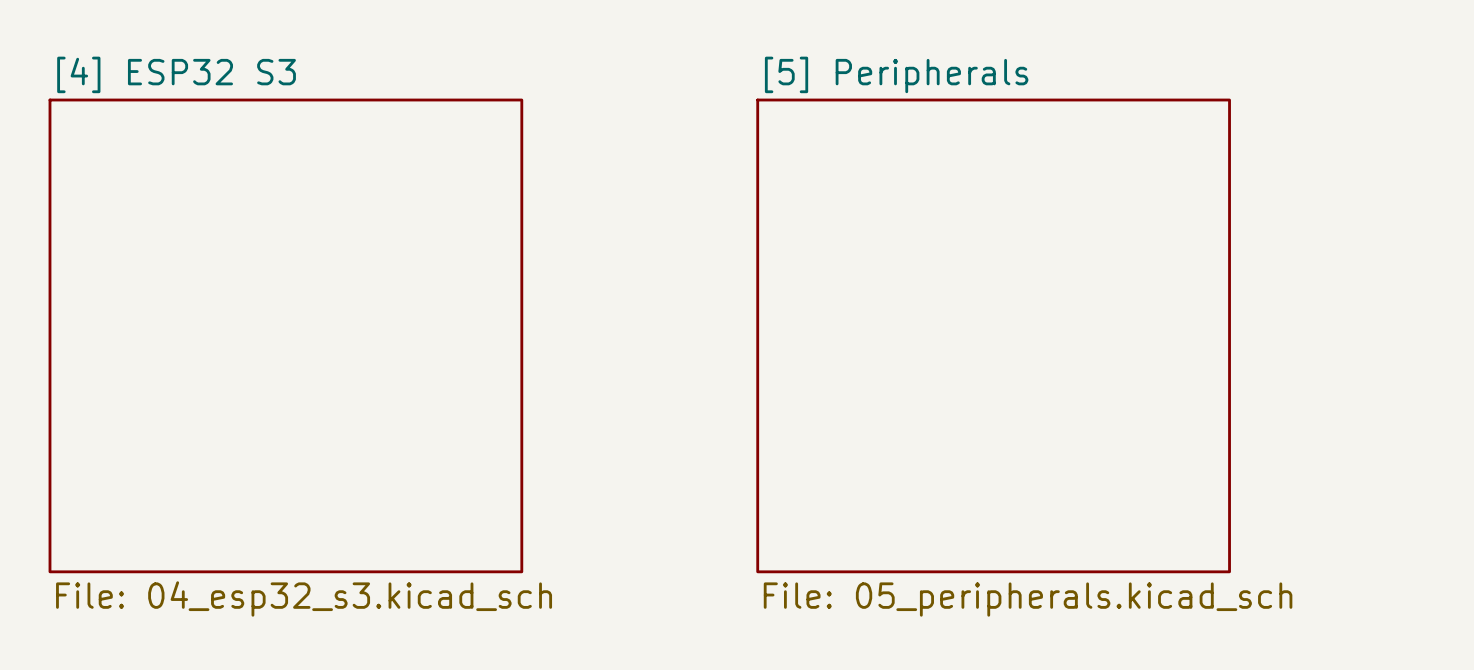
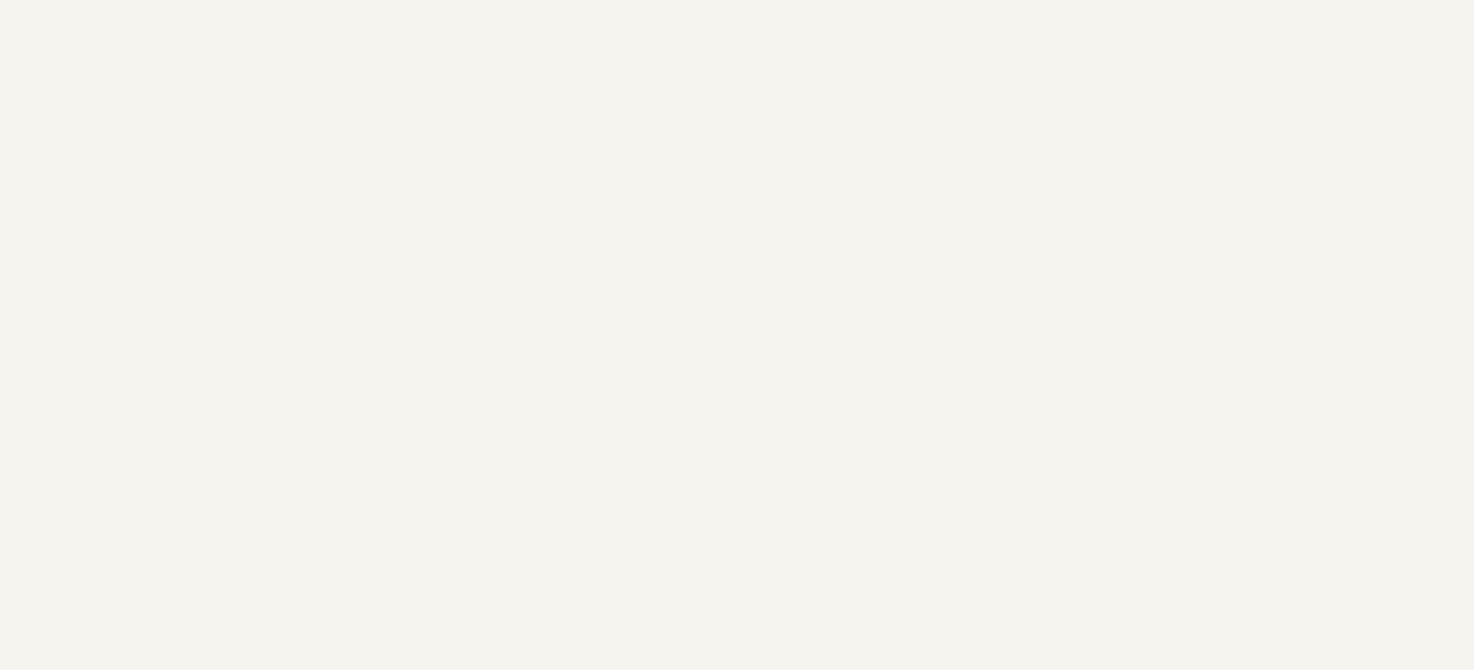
sheet [4] ESP32 S3: File: 04_esp32_s3.kicad_sch (285, 335) -> none
sheet [5] Peripherals: File: 05_peripherals.kicad_sch (993, 335) -> none

